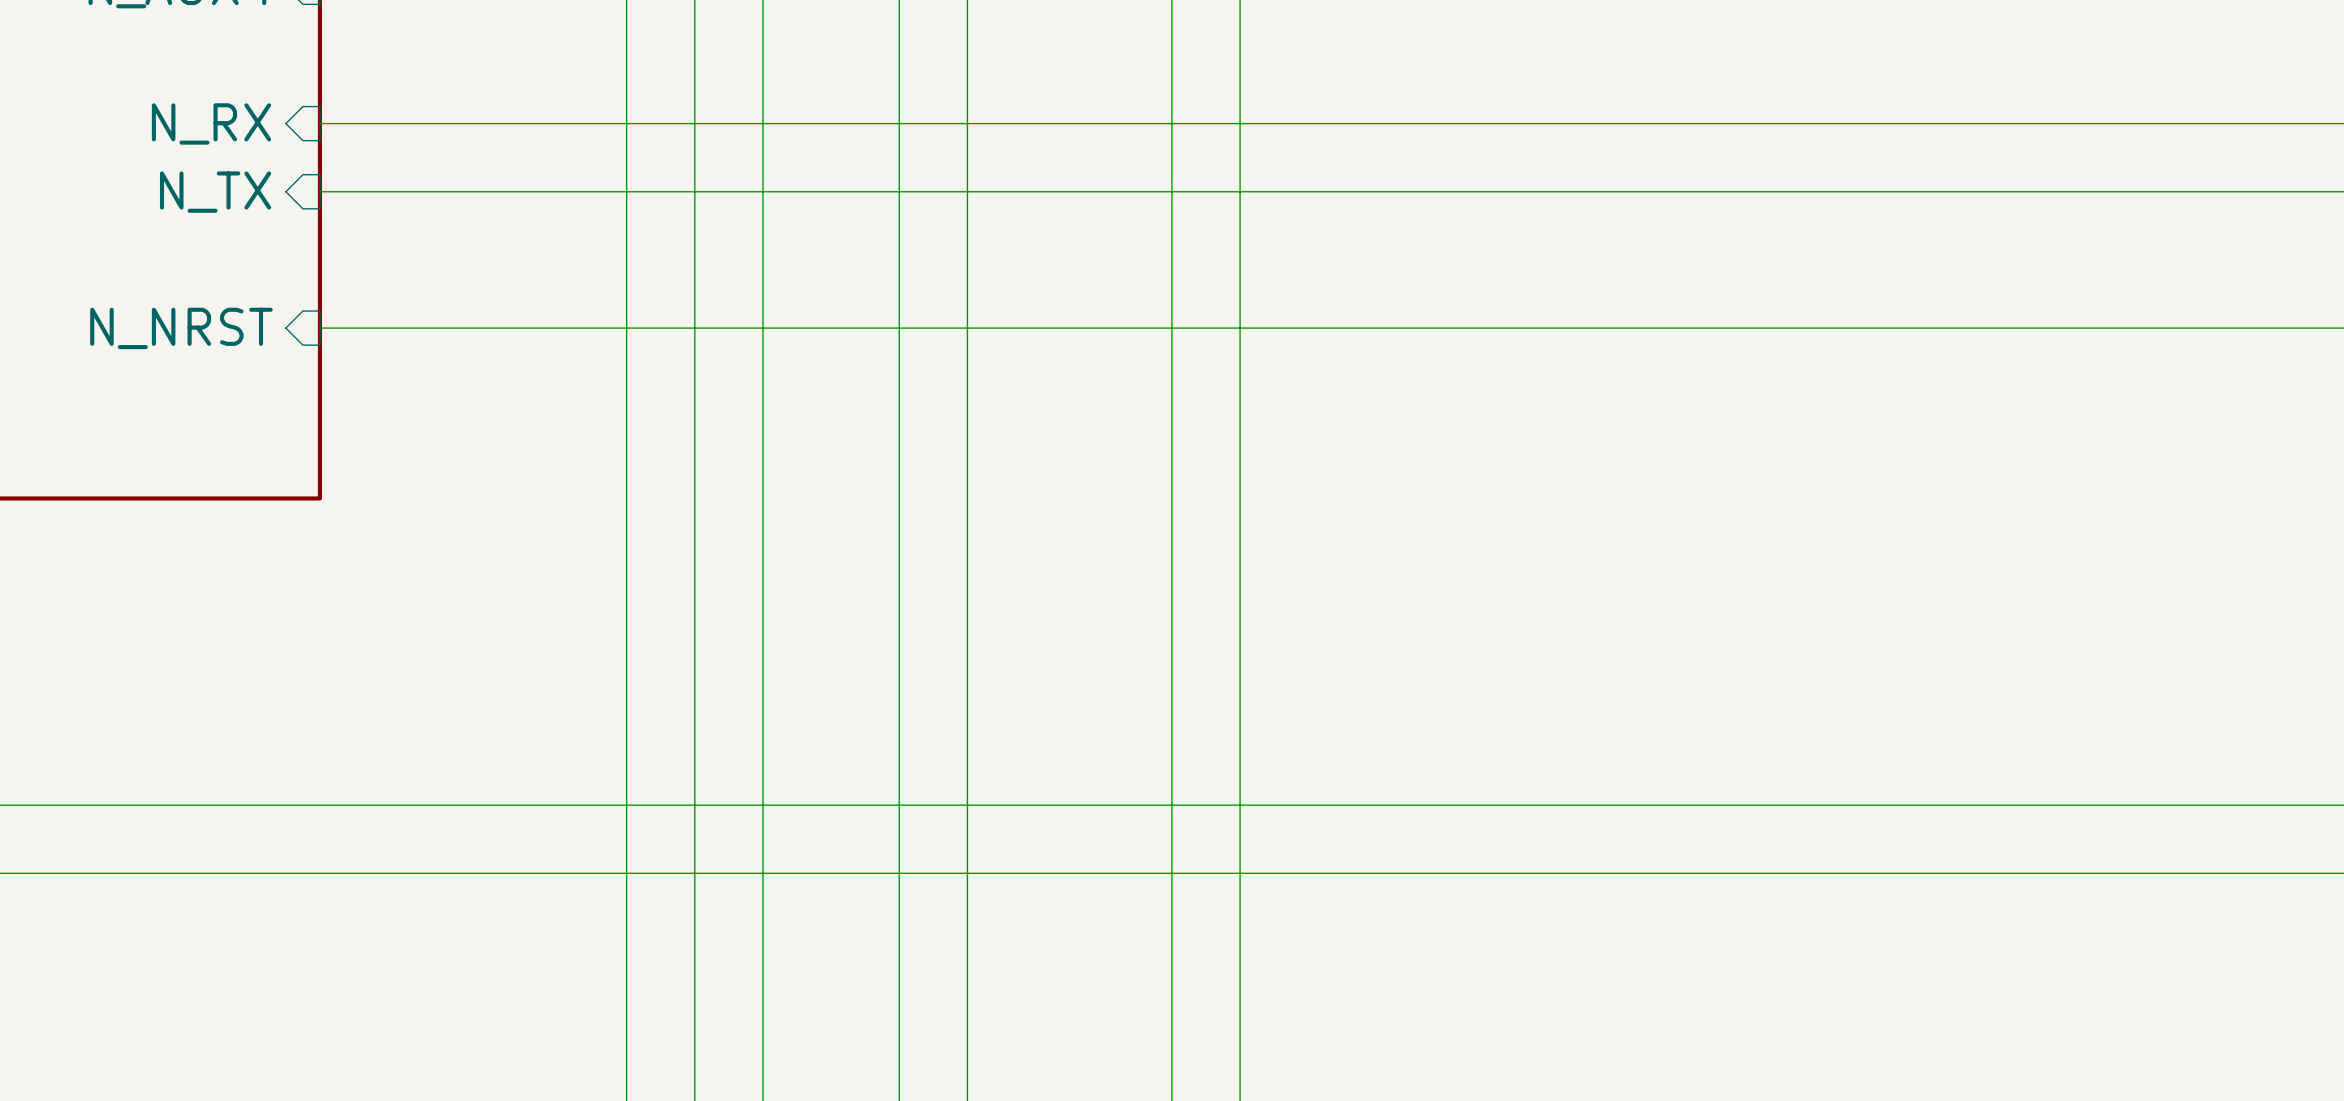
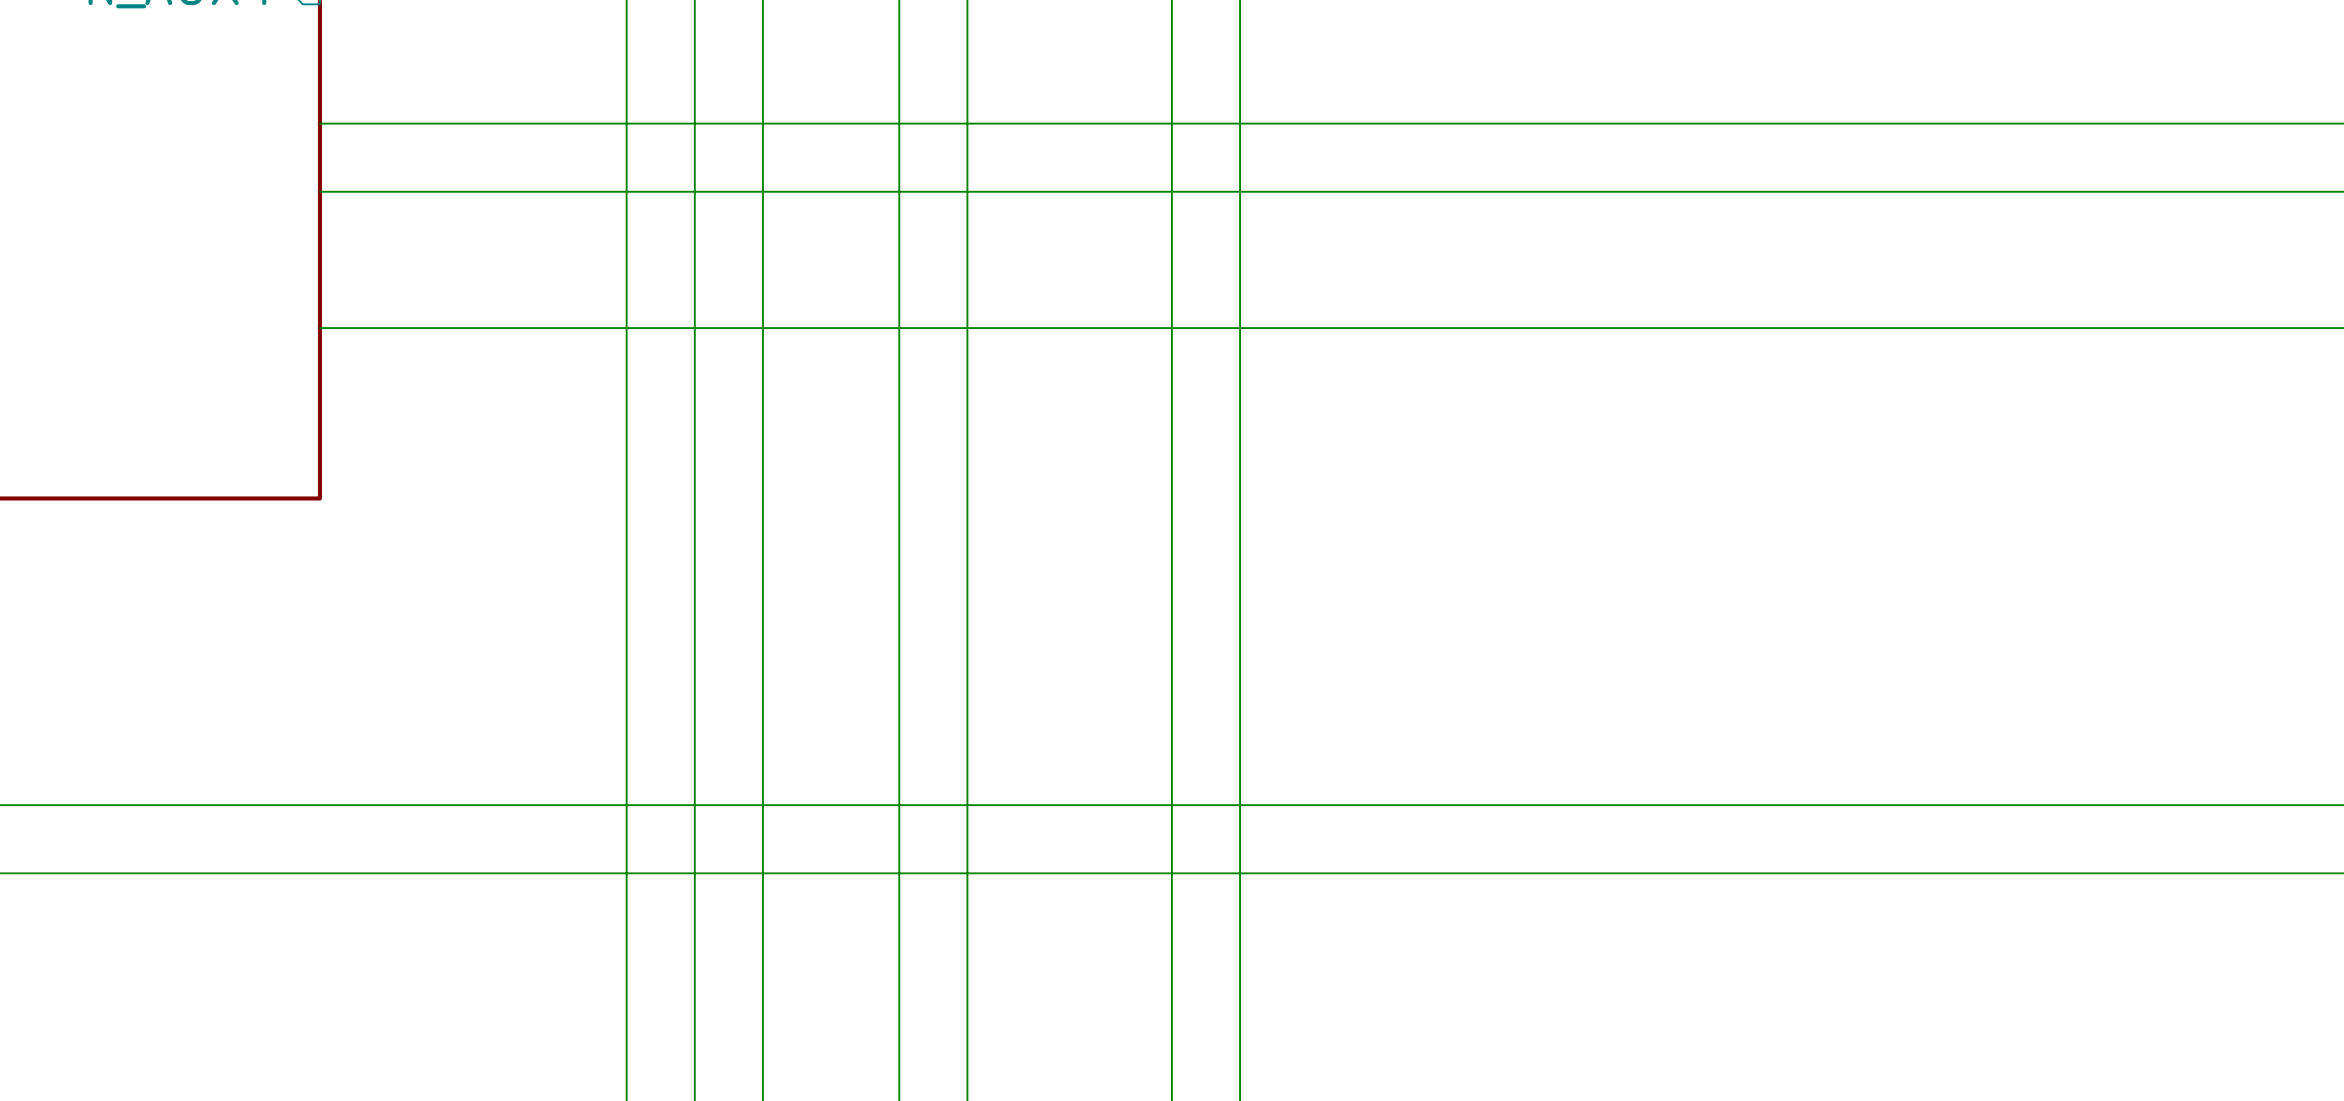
sheet pin: N_RX (211, 123) -> none
sheet pin: N_TX (215, 192) -> none
sheet pin: N_NRST (181, 328) -> none

